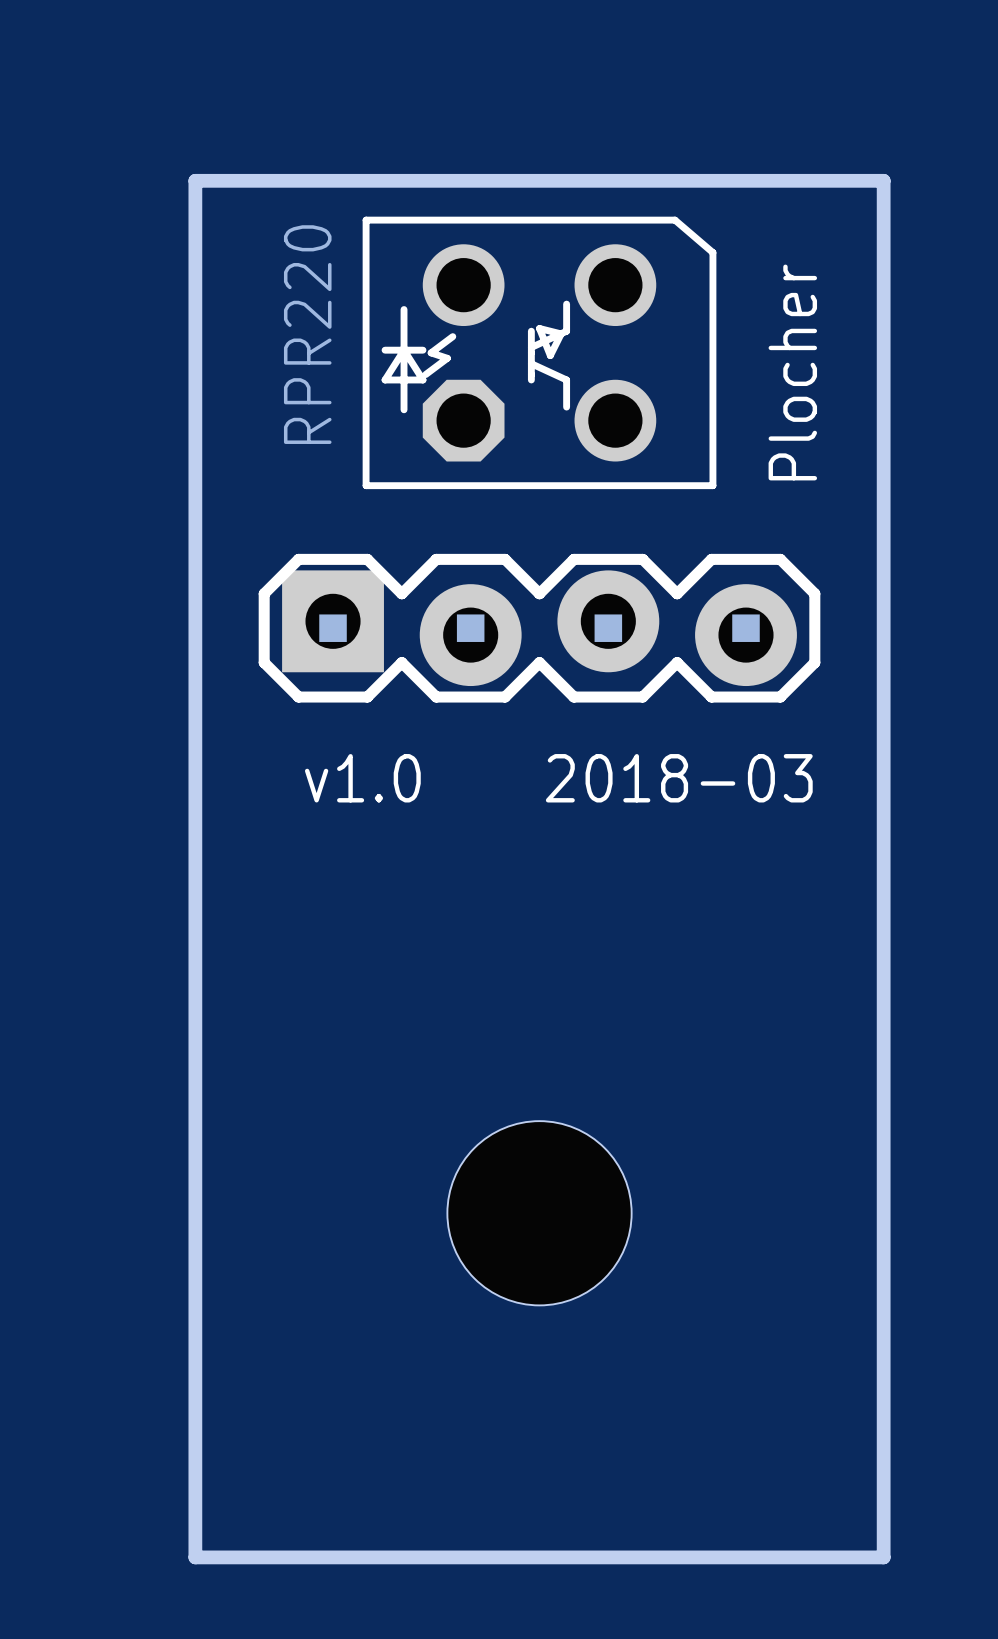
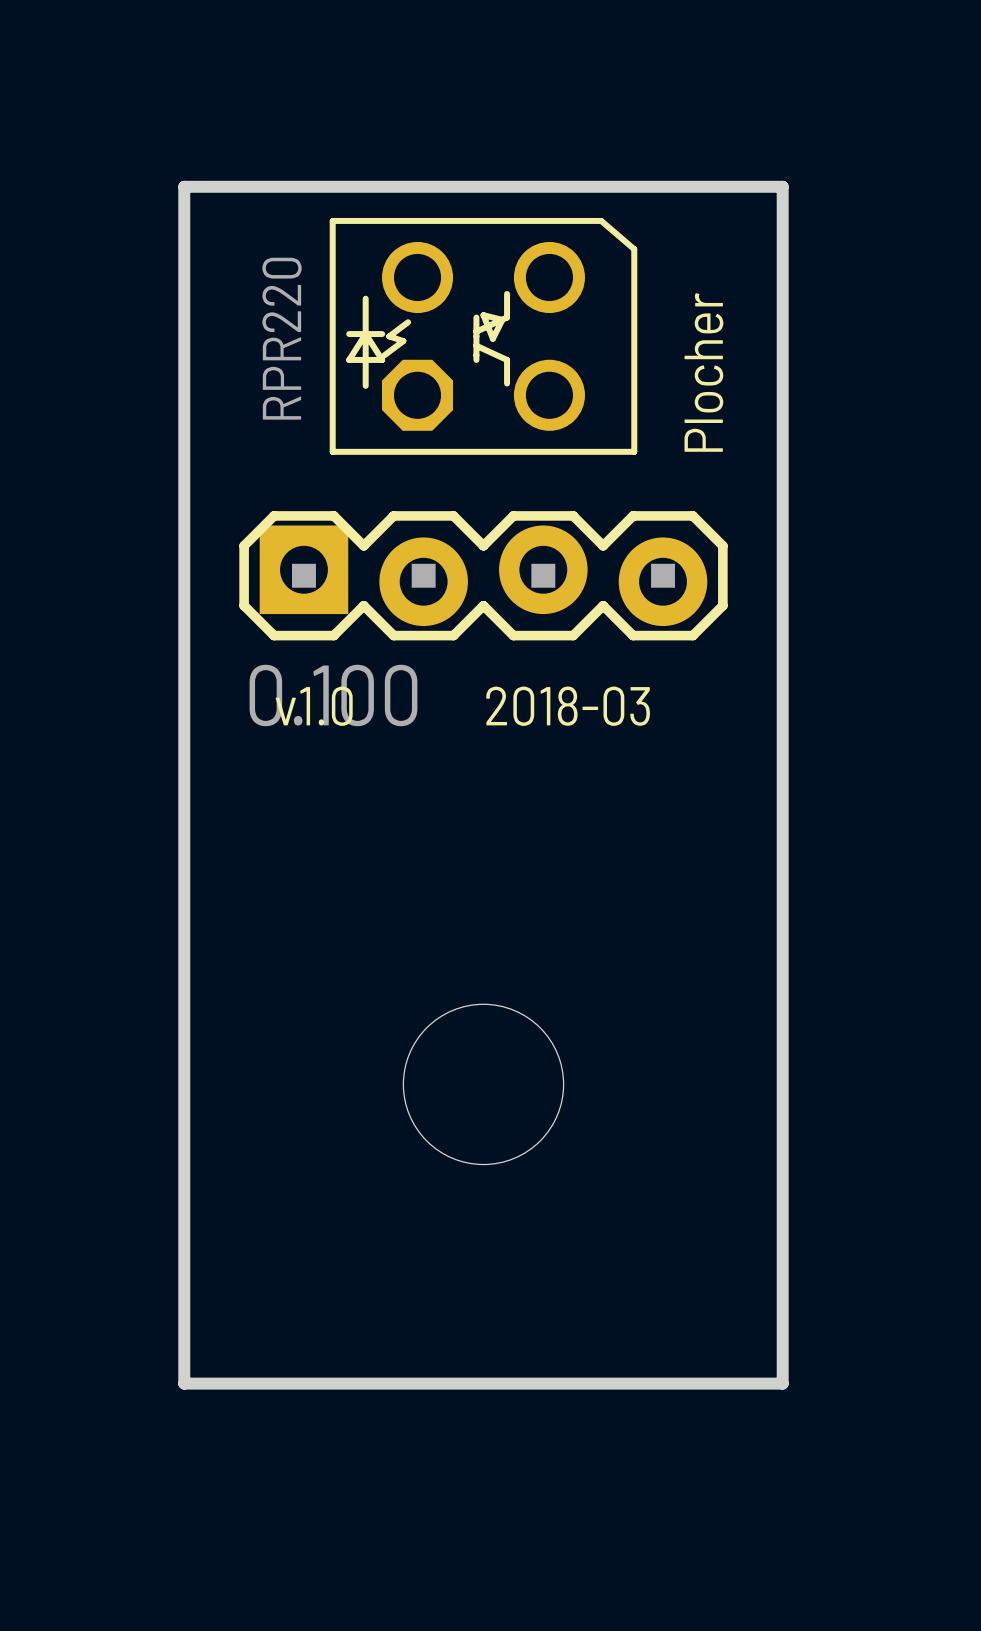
part value: none -> 0.100 (333, 695)

